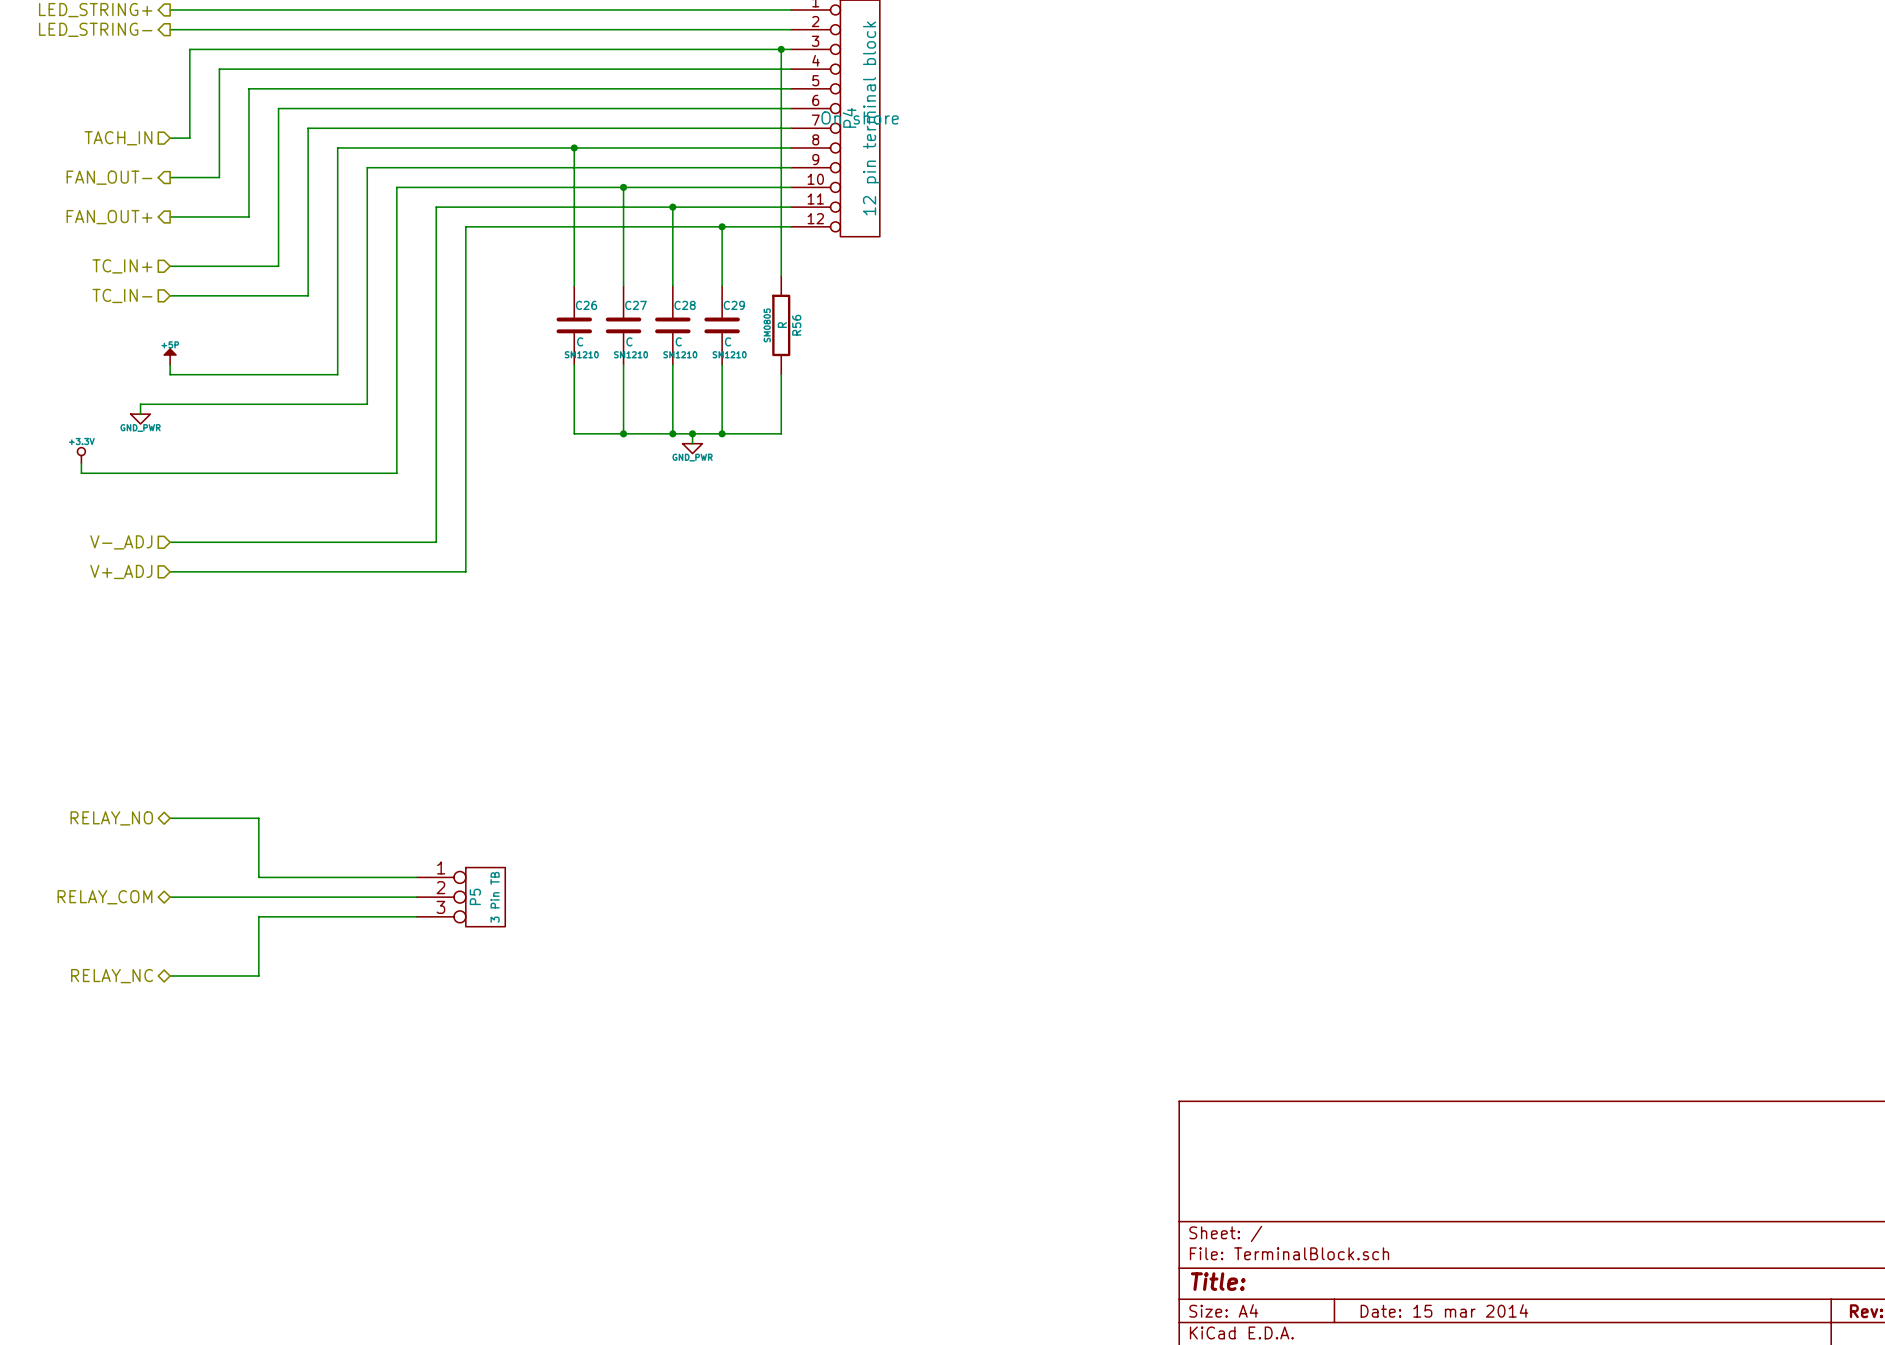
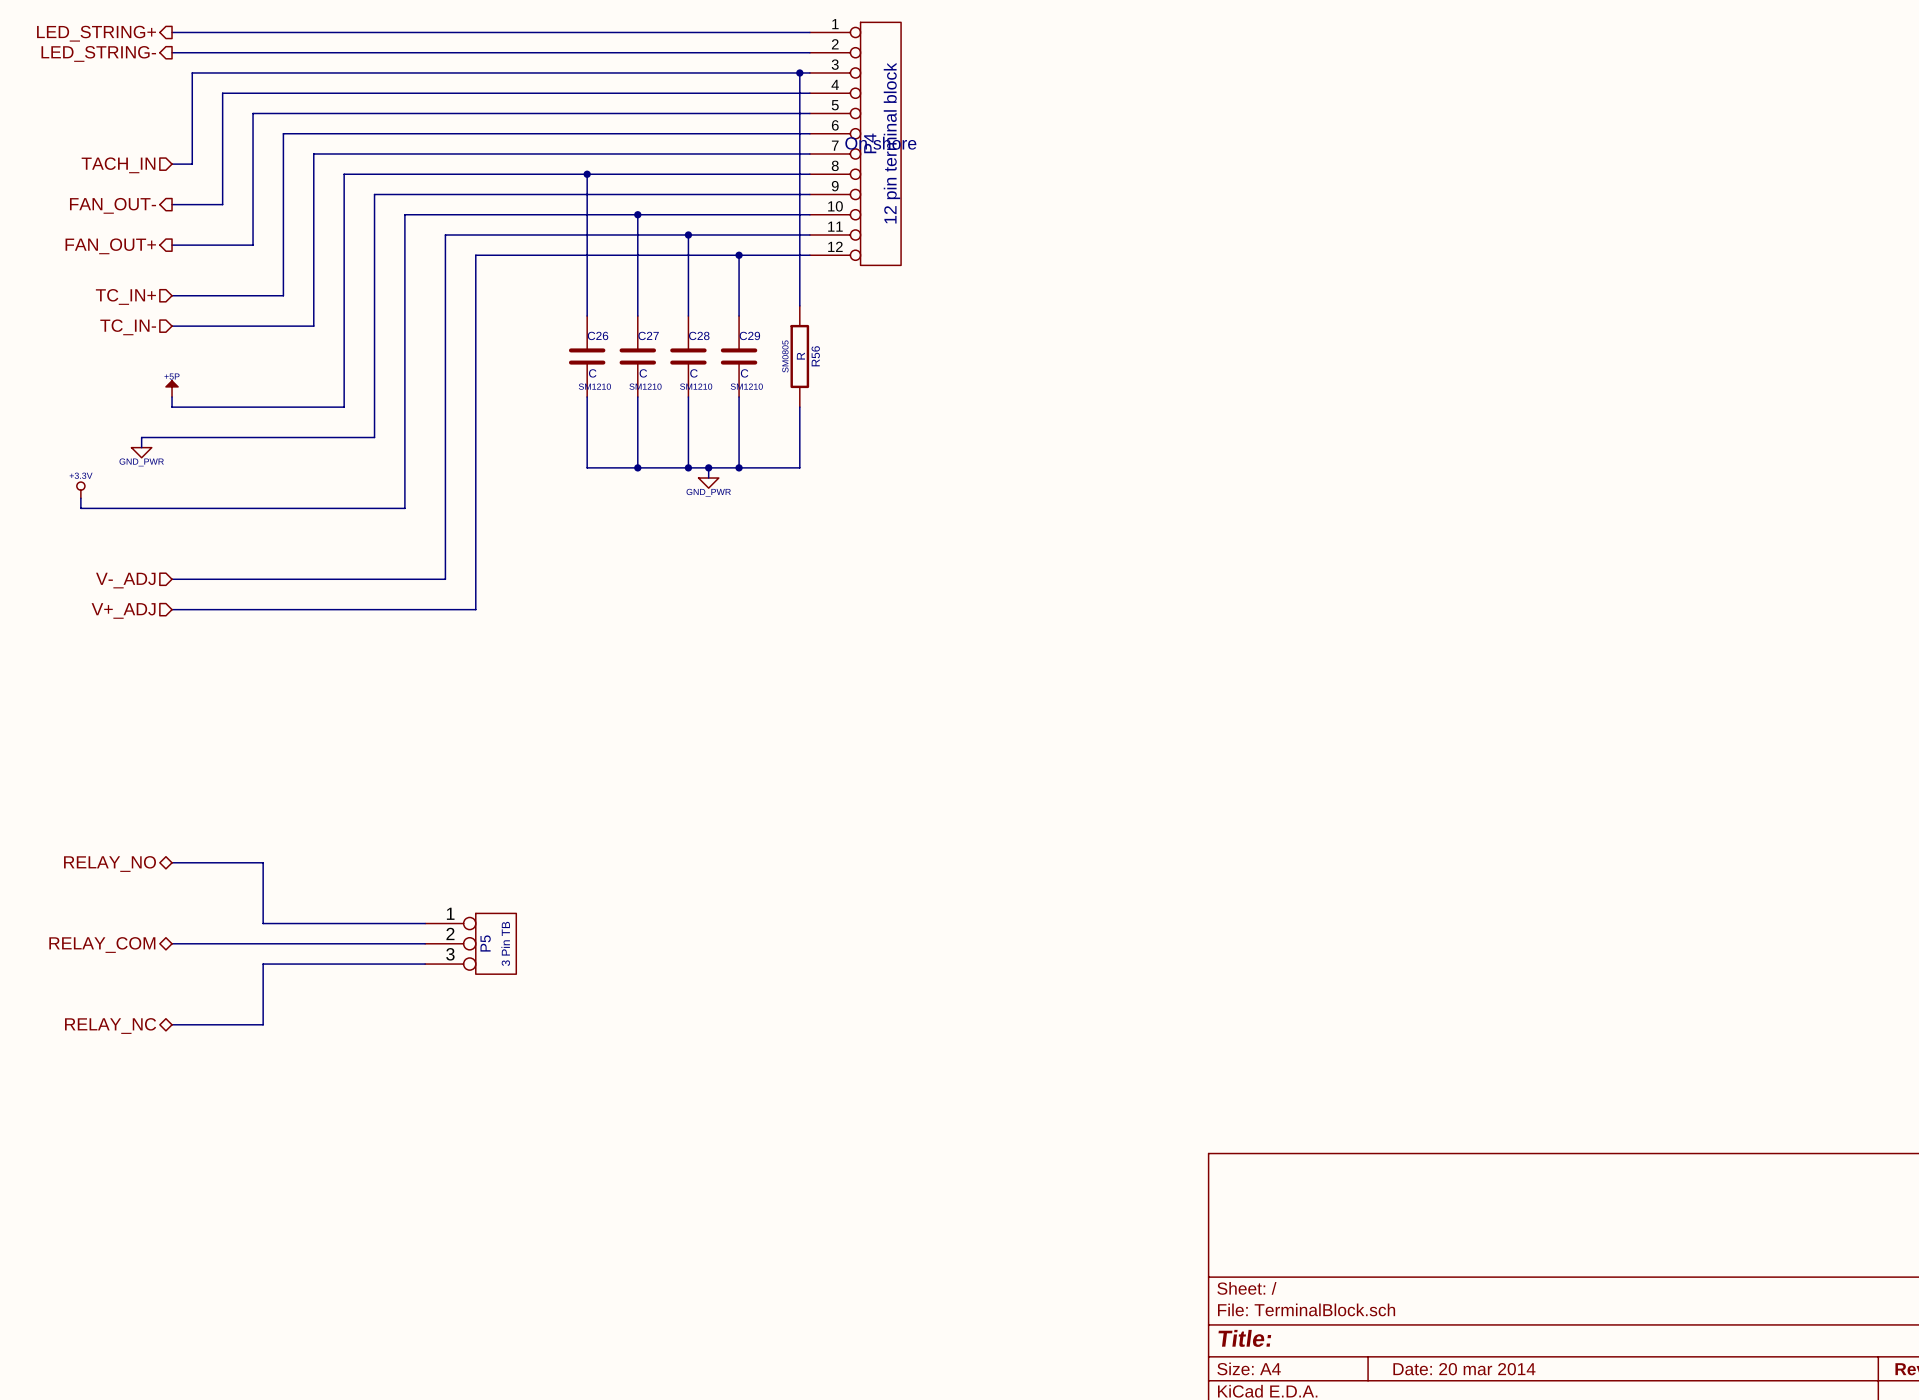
title block: Date: 15 mar 2014 (1444, 1310) -> Date: 20 mar 2014 (1464, 1369)

